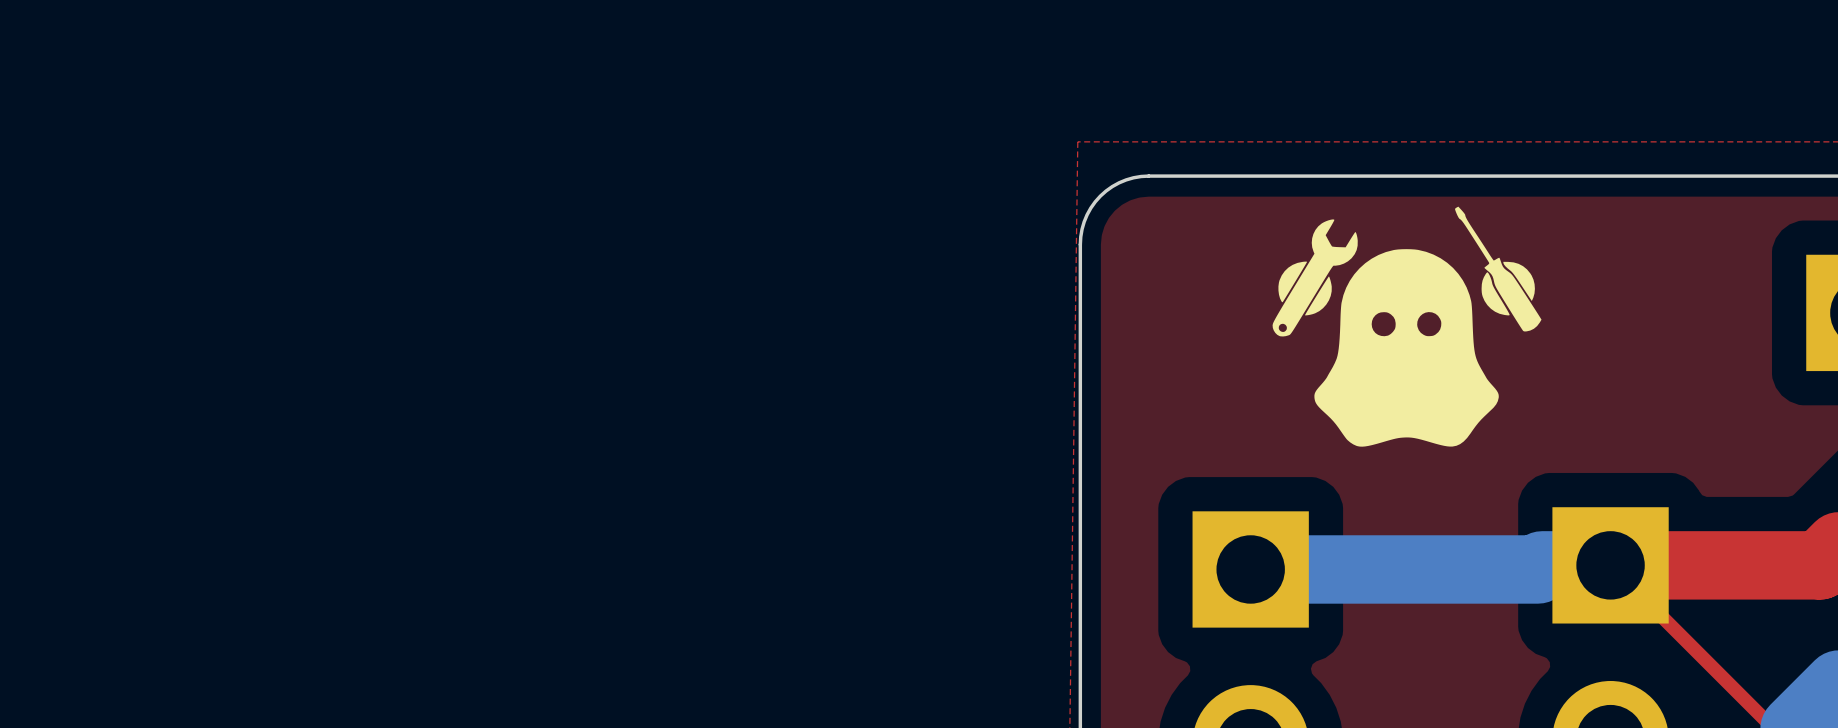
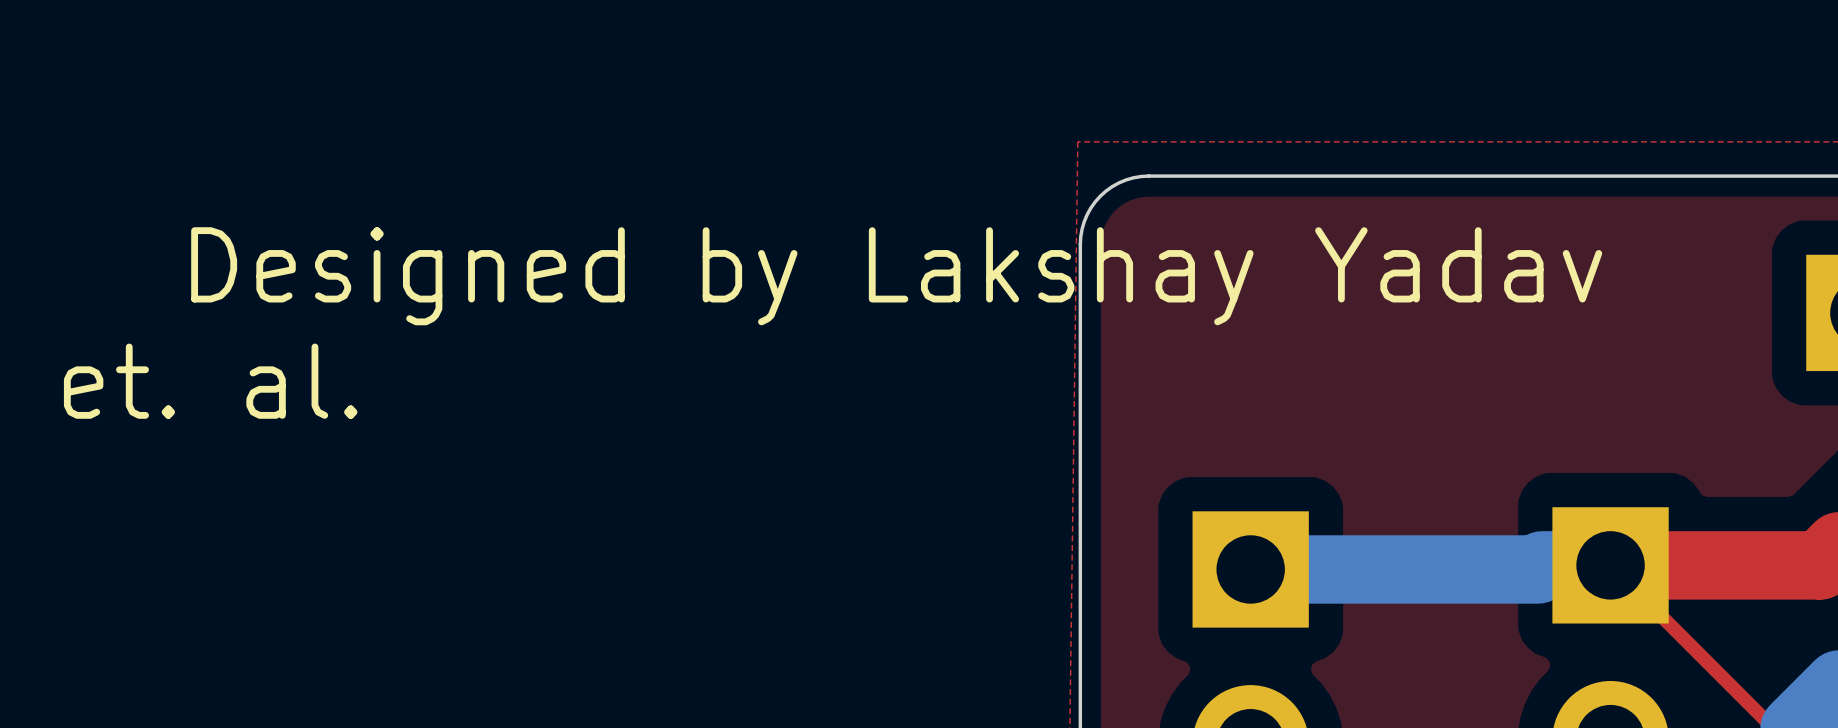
drawing: [1272, 206, 1542, 447] -> none
text: none -> Designed by Lakshay Yadav (896, 276)
text: none -> et. al. (210, 381)

